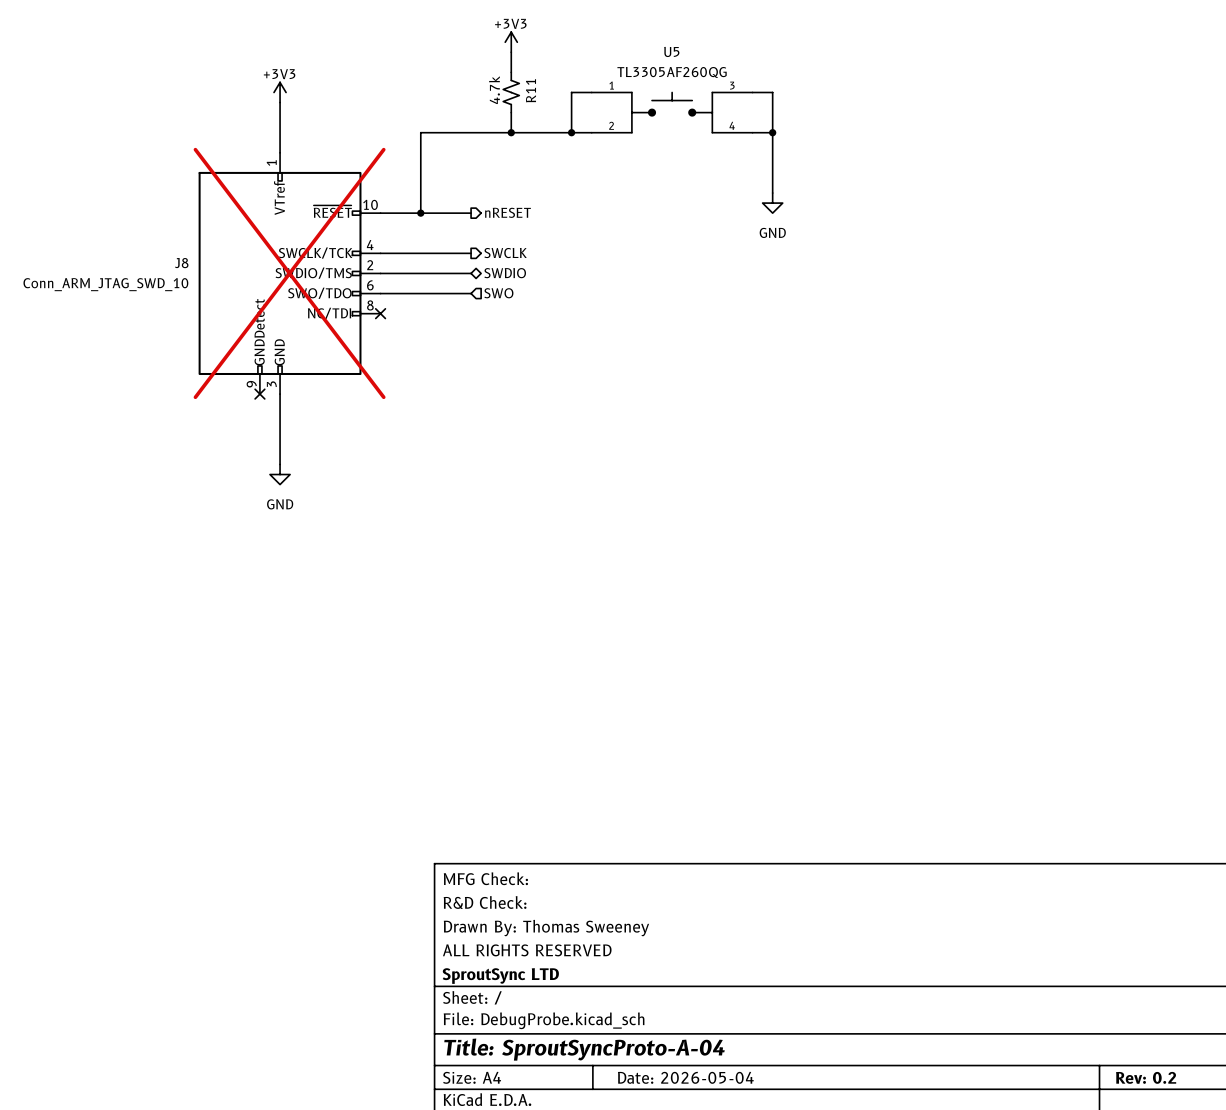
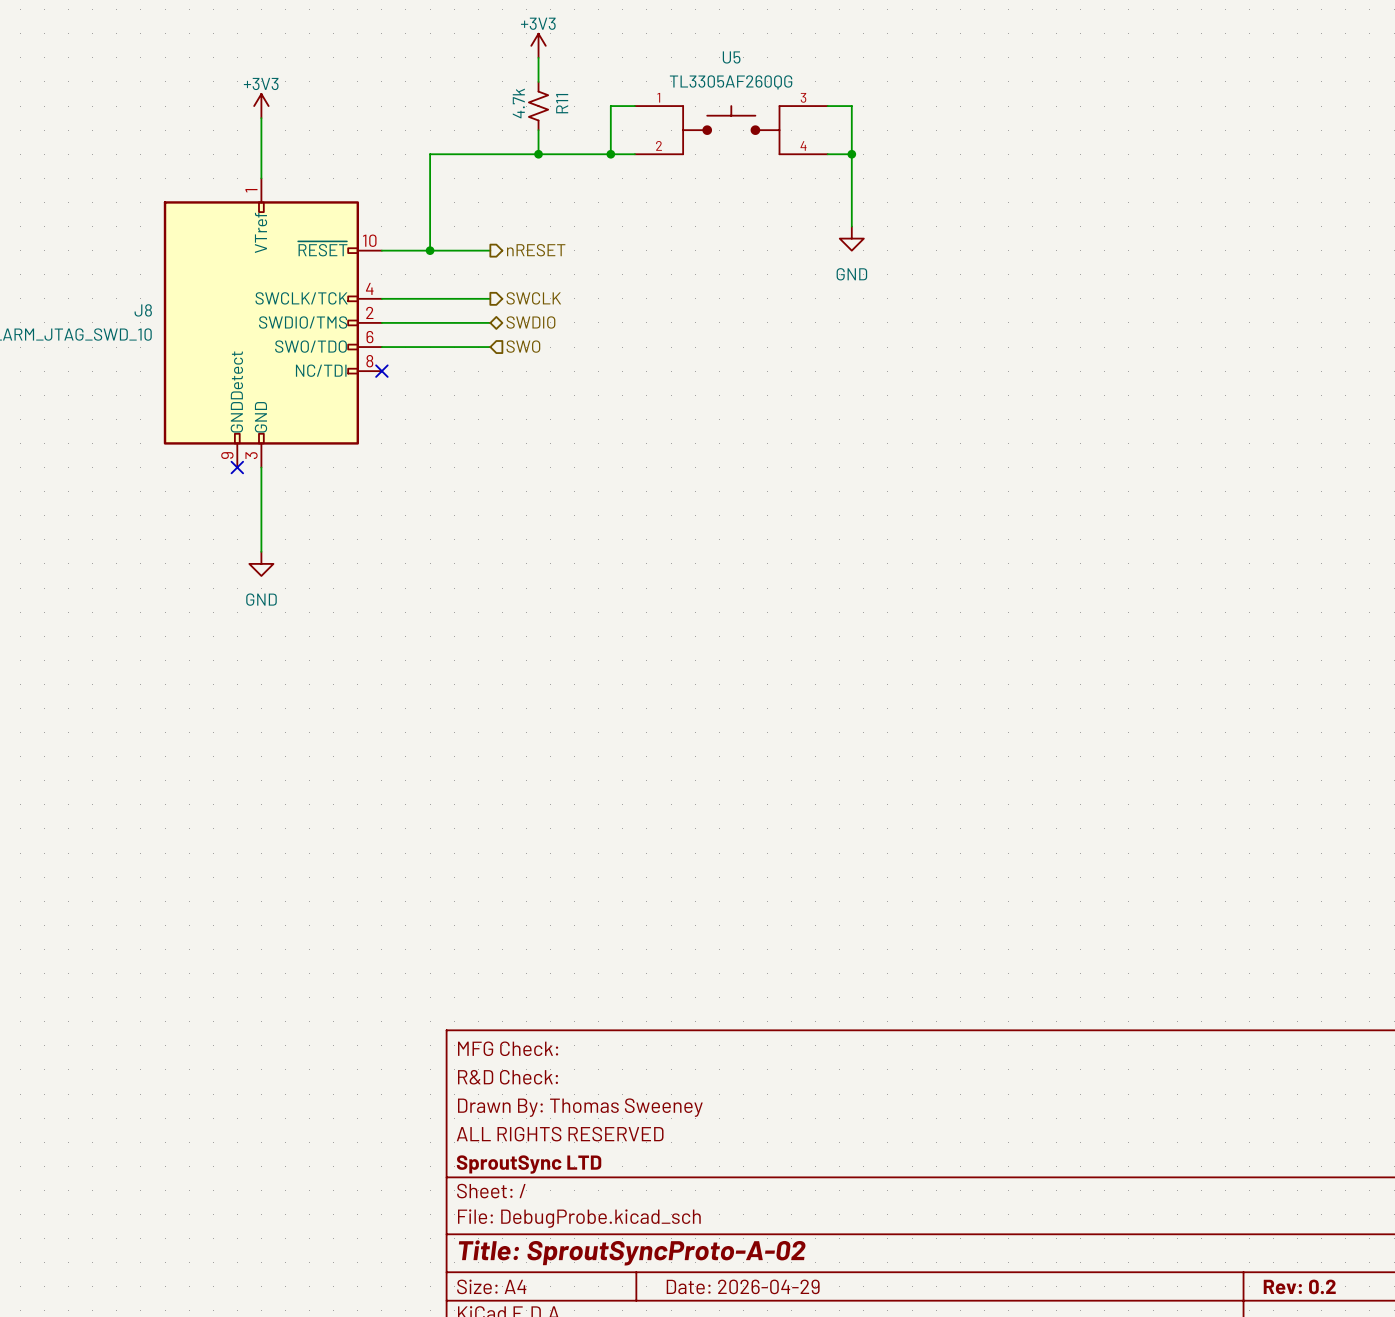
J8 do-not-place cross: (289, 273) -> none
title block: Title: SproutSyncProto-A-04 (584, 1049) -> Title: SproutSyncProto-A-02 (632, 1252)
title block: Date: 2026-05-04 (685, 1077) -> Date: 2026-04-29 (743, 1286)

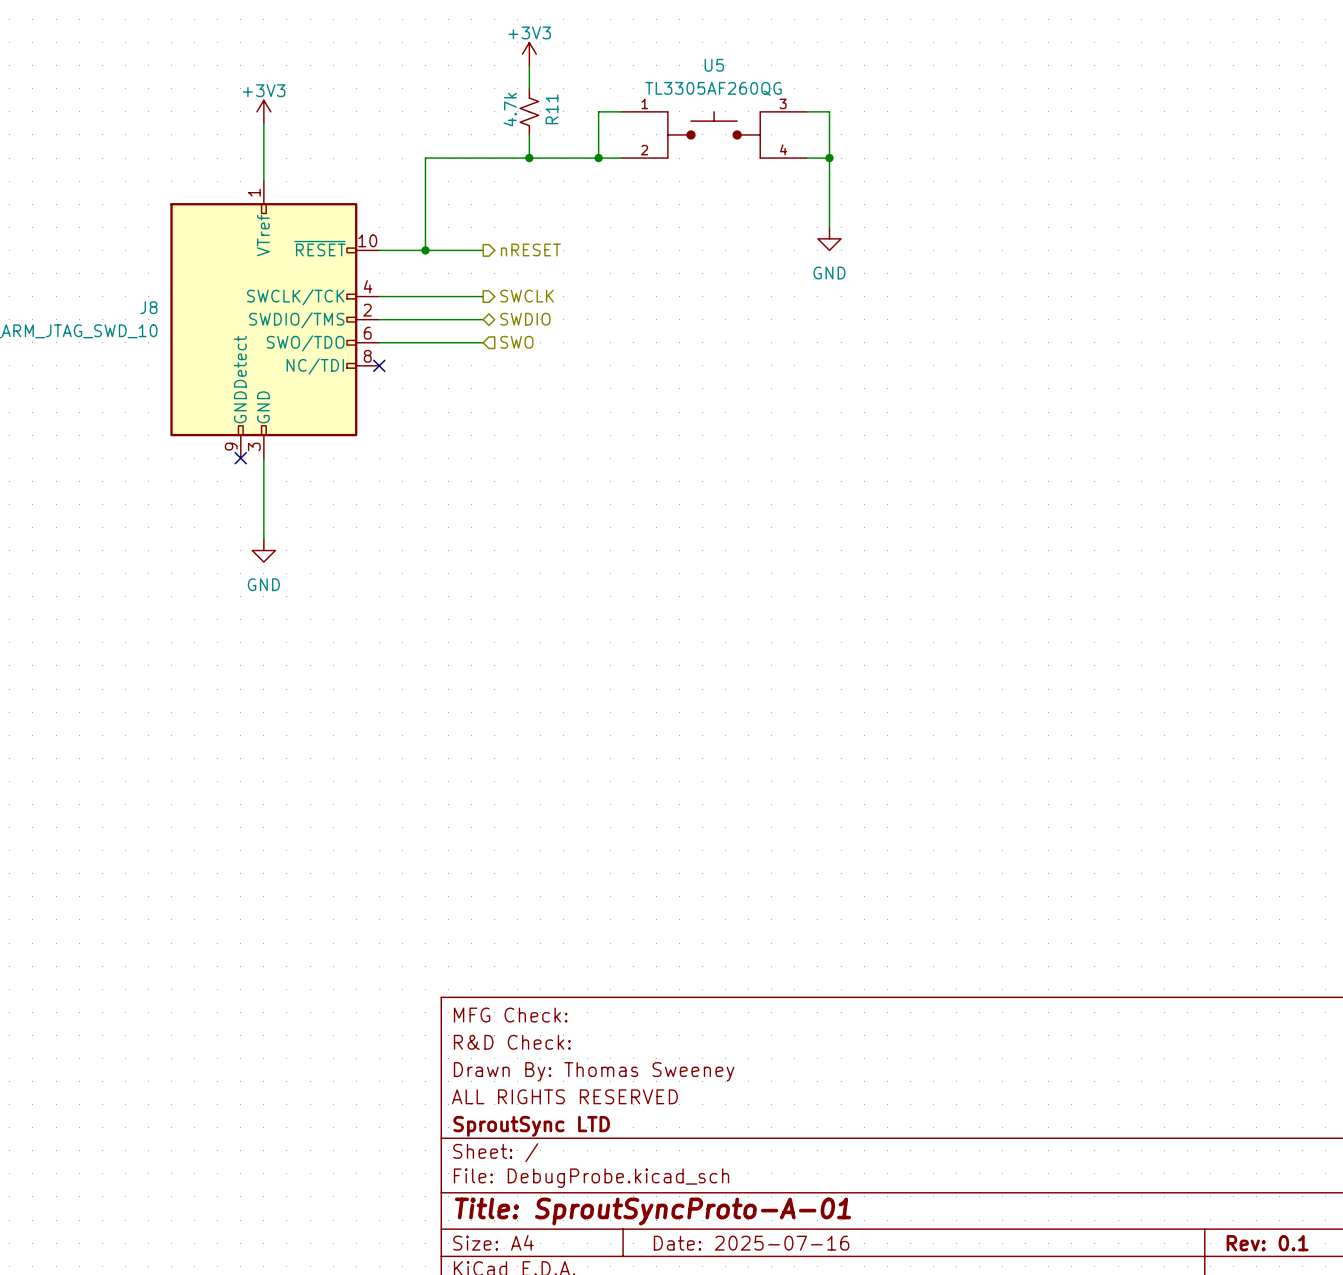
title block: Title: SproutSyncProto-A-02 (632, 1252) -> Title: SproutSyncProto-A-01 (653, 1211)
title block: Date: 2026-04-29 (743, 1286) -> Date: 2025-07-16 (751, 1243)
title block: Rev: 0.2 (1299, 1286) -> Rev: 0.1 (1267, 1243)

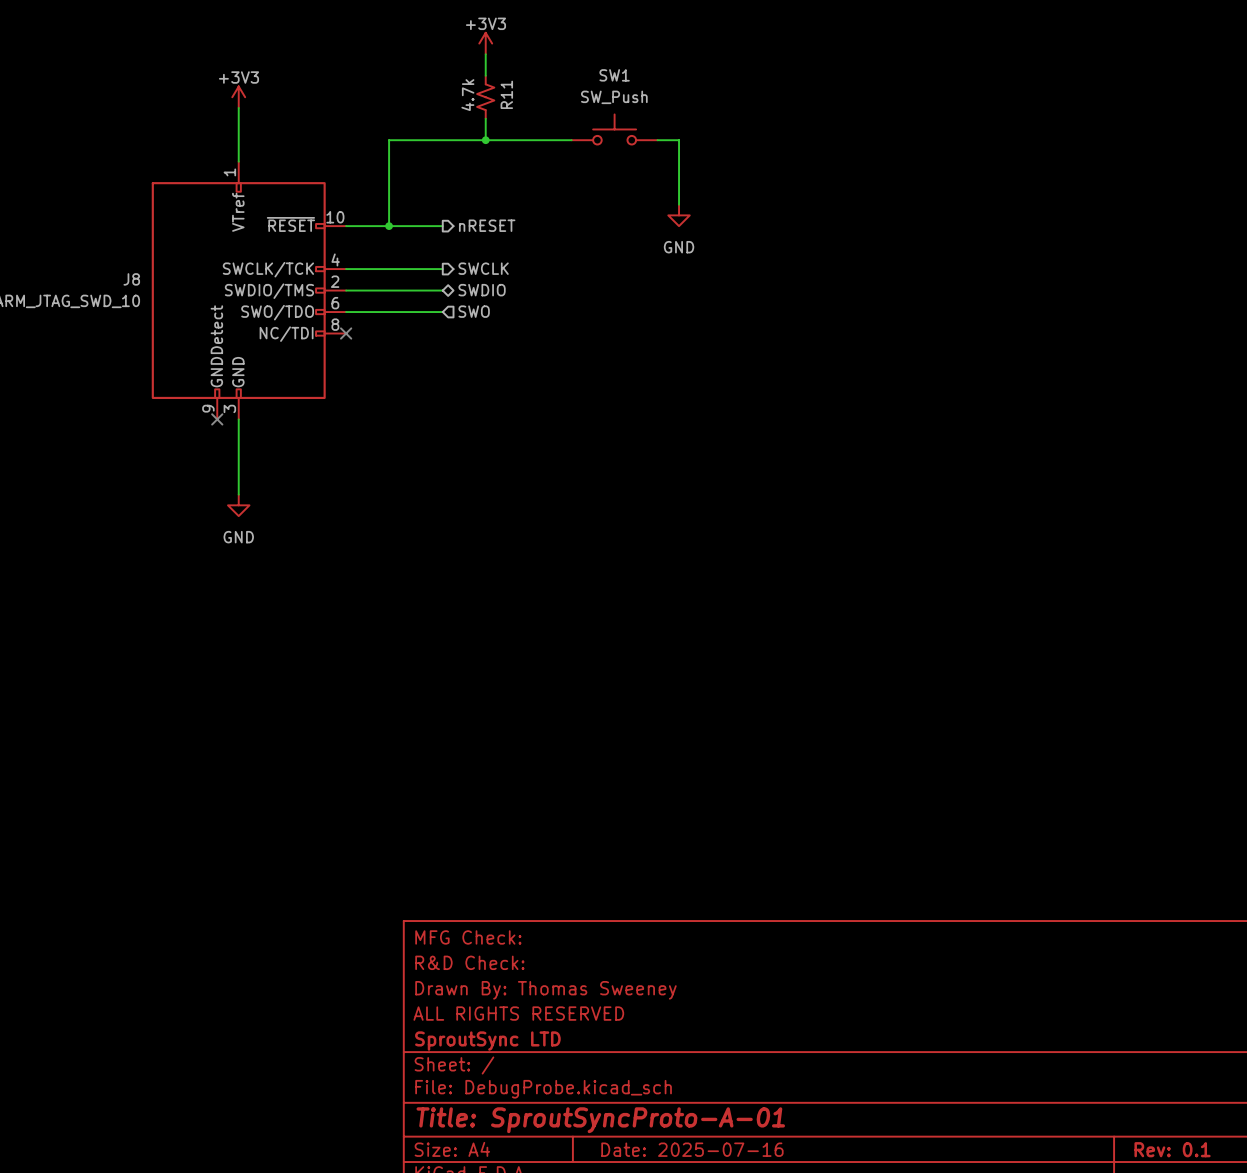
wire: (621, 111) (598, 111) (598, 158) -> none
wire: (806, 111) (829, 111) (829, 227) -> none
U5: TL3305AF260QG (714, 134) -> none
SW1: none -> SW_Push (614, 129)
junction: (598, 158) -> none
wire: none -> (657, 140) (679, 140) (679, 204)
wire: (806, 158) (829, 158) -> none
junction: (829, 158) -> none
power symbol position: GND (829, 238) -> GND (679, 215)

